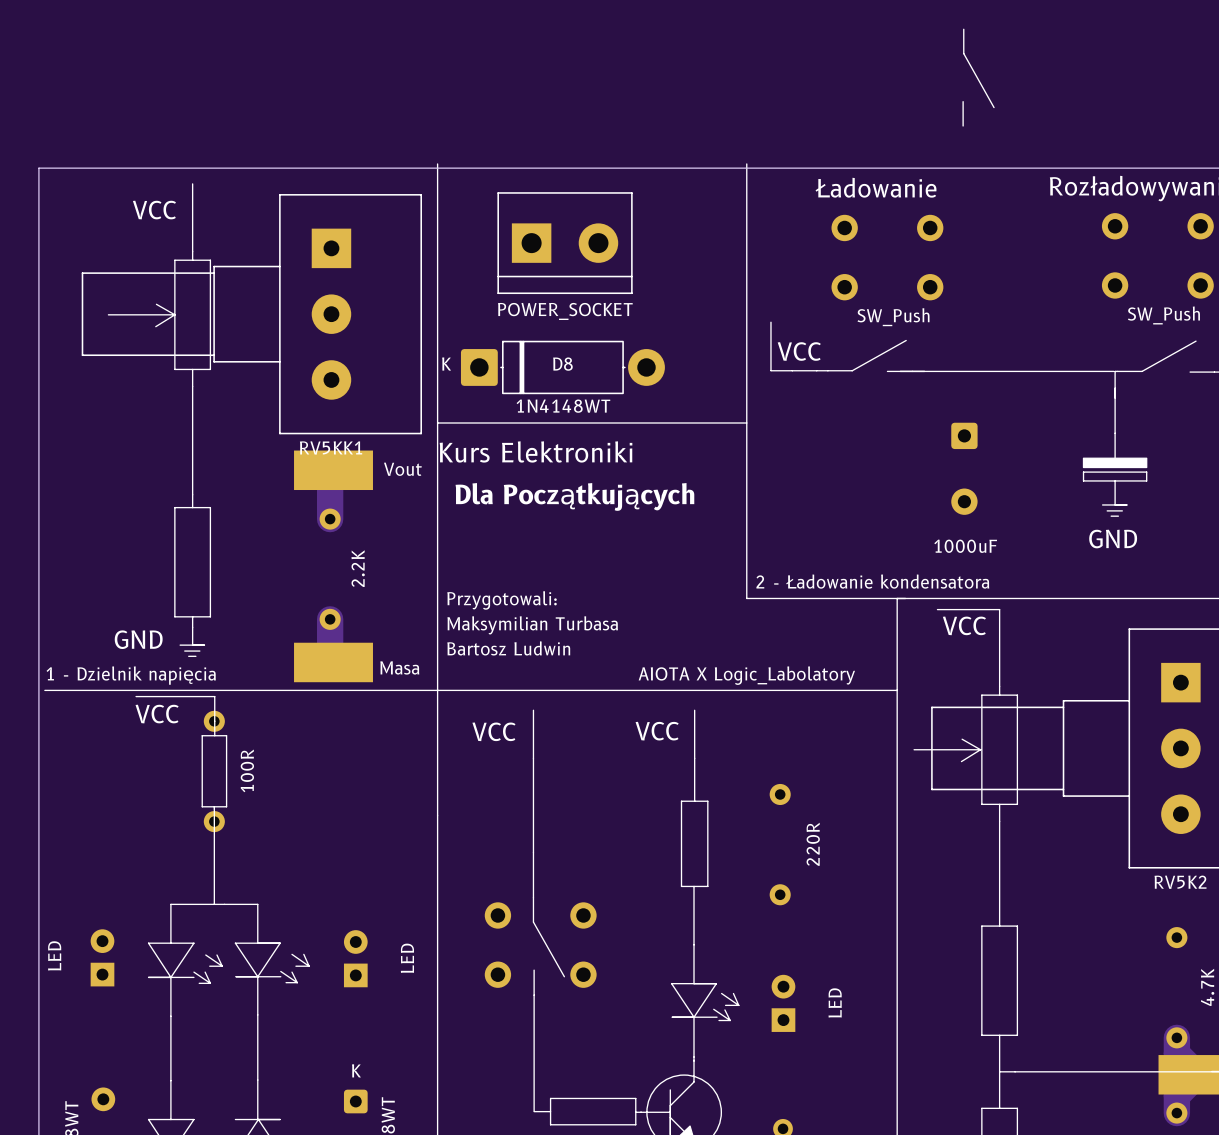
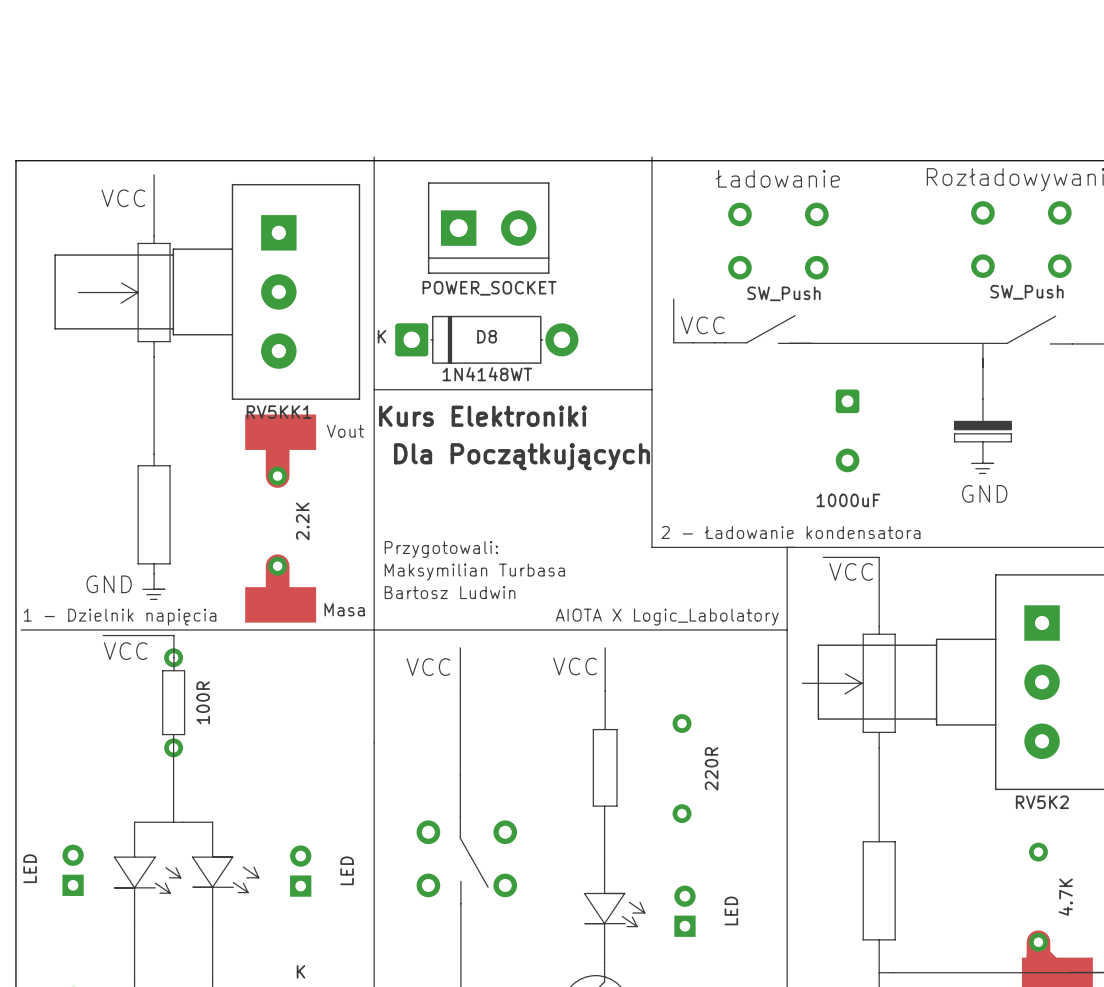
line: (963, 29) (963, 53) (994, 107) -> none
line: (963, 101) (963, 125) -> none

